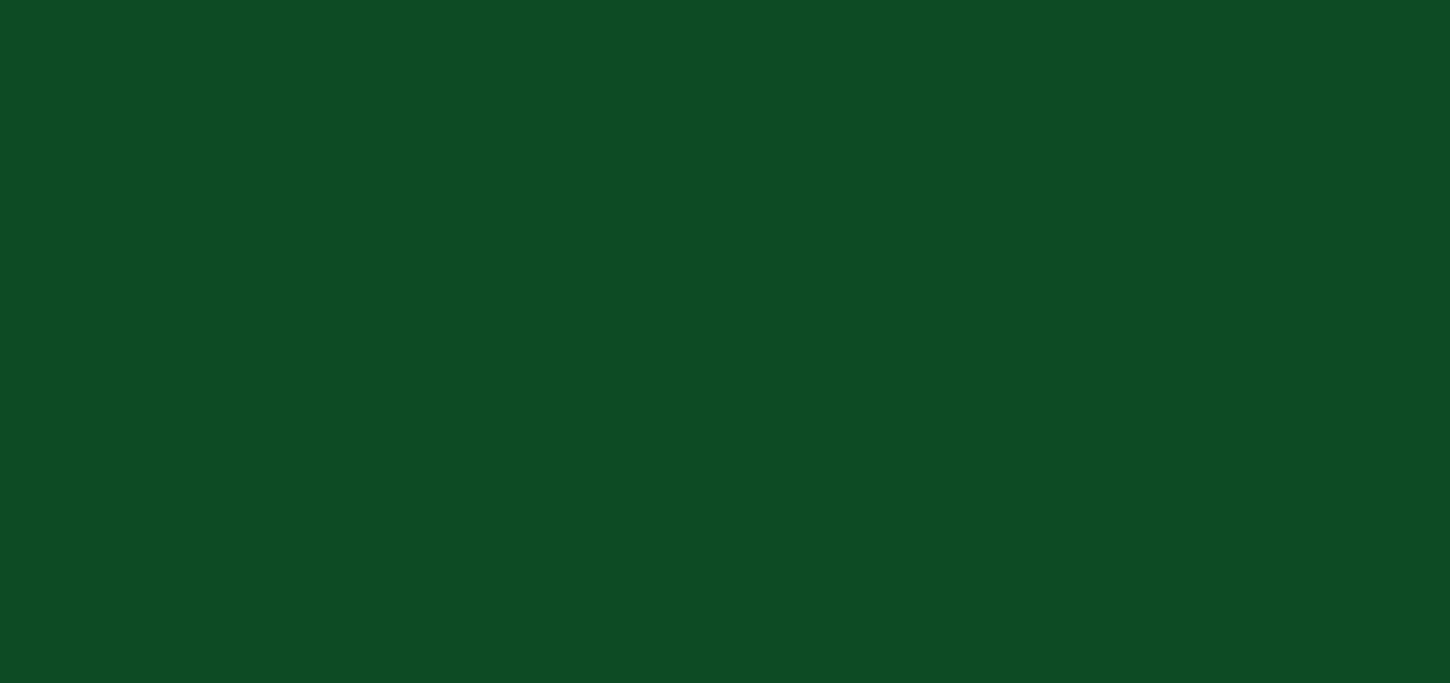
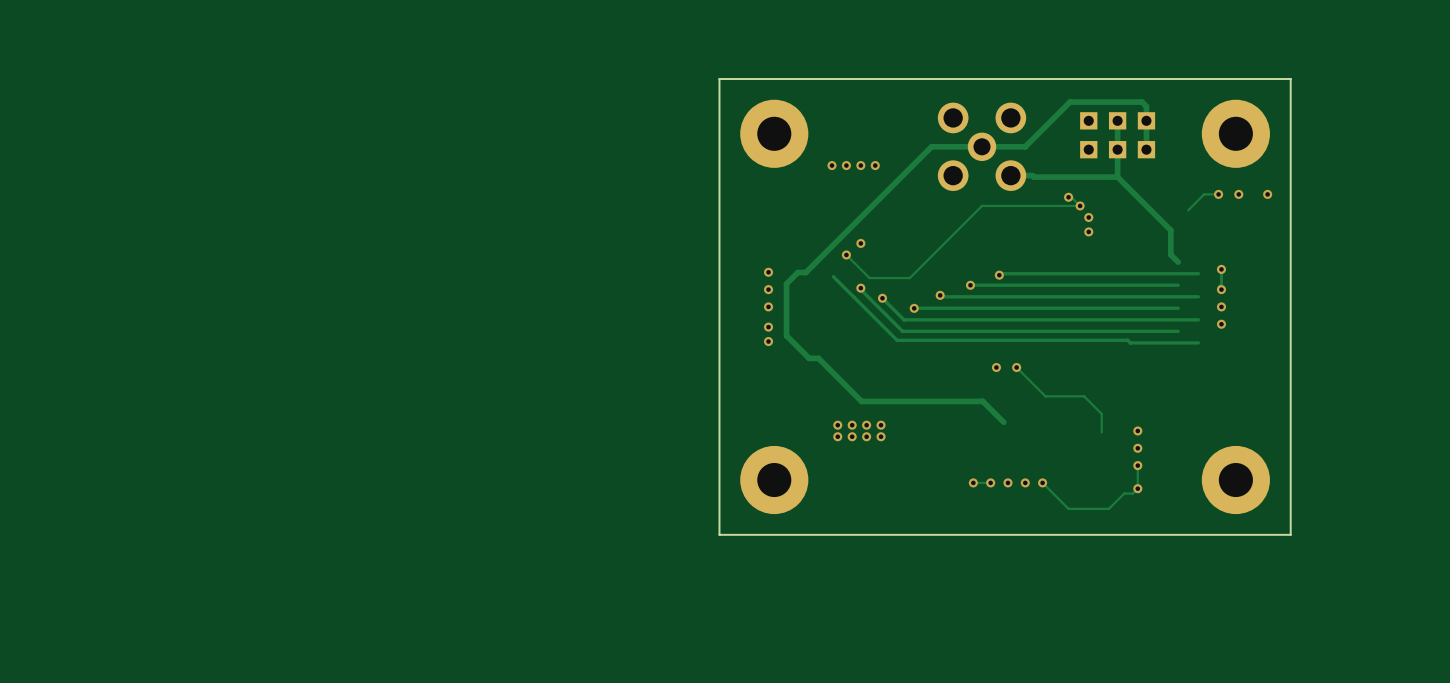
board edge: none -> (1290, 79) (1290, 534) (719, 534) (719, 79) (1290, 79)
track: none -> (1117, 120) (1117, 177)
part: none -> (774, 133)
part: none -> (1235, 133)
part: none -> (1117, 135)
part: none -> (982, 146)
track: none -> (1146, 149) (1146, 106) (1142, 102) (1070, 102) (1025, 146) (931, 146) (805, 272) (797, 272) (786, 283) (786, 335) (809, 358) (818, 358) (861, 401) (982, 401) (1003, 422)
via: none -> (831, 165)
via: none -> (846, 165)
via: none -> (860, 165)
via: none -> (875, 165)
track: none -> (1010, 175) (1117, 177)
track: none -> (1117, 177) (1170, 230) (1170, 254) (1178, 262)
track: none -> (1218, 194) (1204, 194) (1188, 210)
via: none -> (1218, 194)
via: none -> (1238, 194)
via: none -> (1267, 194)
track: none -> (1068, 197) (1071, 197) (1080, 205) (982, 205) (909, 278) (869, 278) (846, 254)
via: none -> (1068, 197)
via: none -> (1080, 205)
via: none -> (1088, 217)
via: none -> (1088, 231)
via: none -> (860, 243)
via: none -> (846, 254)
track: none -> (1221, 269) (1221, 289)
via: none -> (1221, 269)
via: none -> (768, 272)
track: none -> (1198, 273) (999, 275)
via: none -> (999, 275)
track: none -> (833, 276) (853, 296)
via: none -> (970, 285)
track: none -> (1178, 285) (970, 285)
track: none -> (860, 288) (902, 331) (1178, 331)
via: none -> (860, 288)
via: none -> (768, 289)
via: none -> (1221, 289)
track: none -> (940, 295) (1198, 296)
via: none -> (940, 295)
track: none -> (853, 296) (897, 340) (1127, 340) (1130, 342) (1198, 342)
track: none -> (882, 298) (904, 319) (1198, 319)
via: none -> (882, 298)
via: none -> (768, 306)
via: none -> (1221, 306)
via: none -> (914, 308)
track: none -> (1178, 308) (914, 308)
via: none -> (1221, 324)
via: none -> (768, 327)
via: none -> (768, 341)
via: none -> (996, 367)
track: none -> (1016, 367) (1045, 396) (1084, 396) (1101, 413) (1101, 432)
via: none -> (1016, 367)
via: none -> (837, 425)
via: none -> (852, 425)
via: none -> (866, 425)
via: none -> (881, 425)
via: none -> (1137, 430)
via: none -> (837, 436)
via: none -> (852, 436)
via: none -> (866, 436)
via: none -> (881, 436)
via: none -> (1137, 448)
track: none -> (1137, 465) (1137, 488) (1132, 493) (1124, 493) (1108, 508) (1068, 508) (1042, 482)
via: none -> (1137, 465)
part: none -> (774, 480)
part: none -> (1235, 480)
via: none -> (973, 482)
track: none -> (990, 482) (973, 482)
via: none -> (990, 482)
via: none -> (1007, 482)
via: none -> (1025, 482)
via: none -> (1042, 482)
via: none -> (1137, 488)

